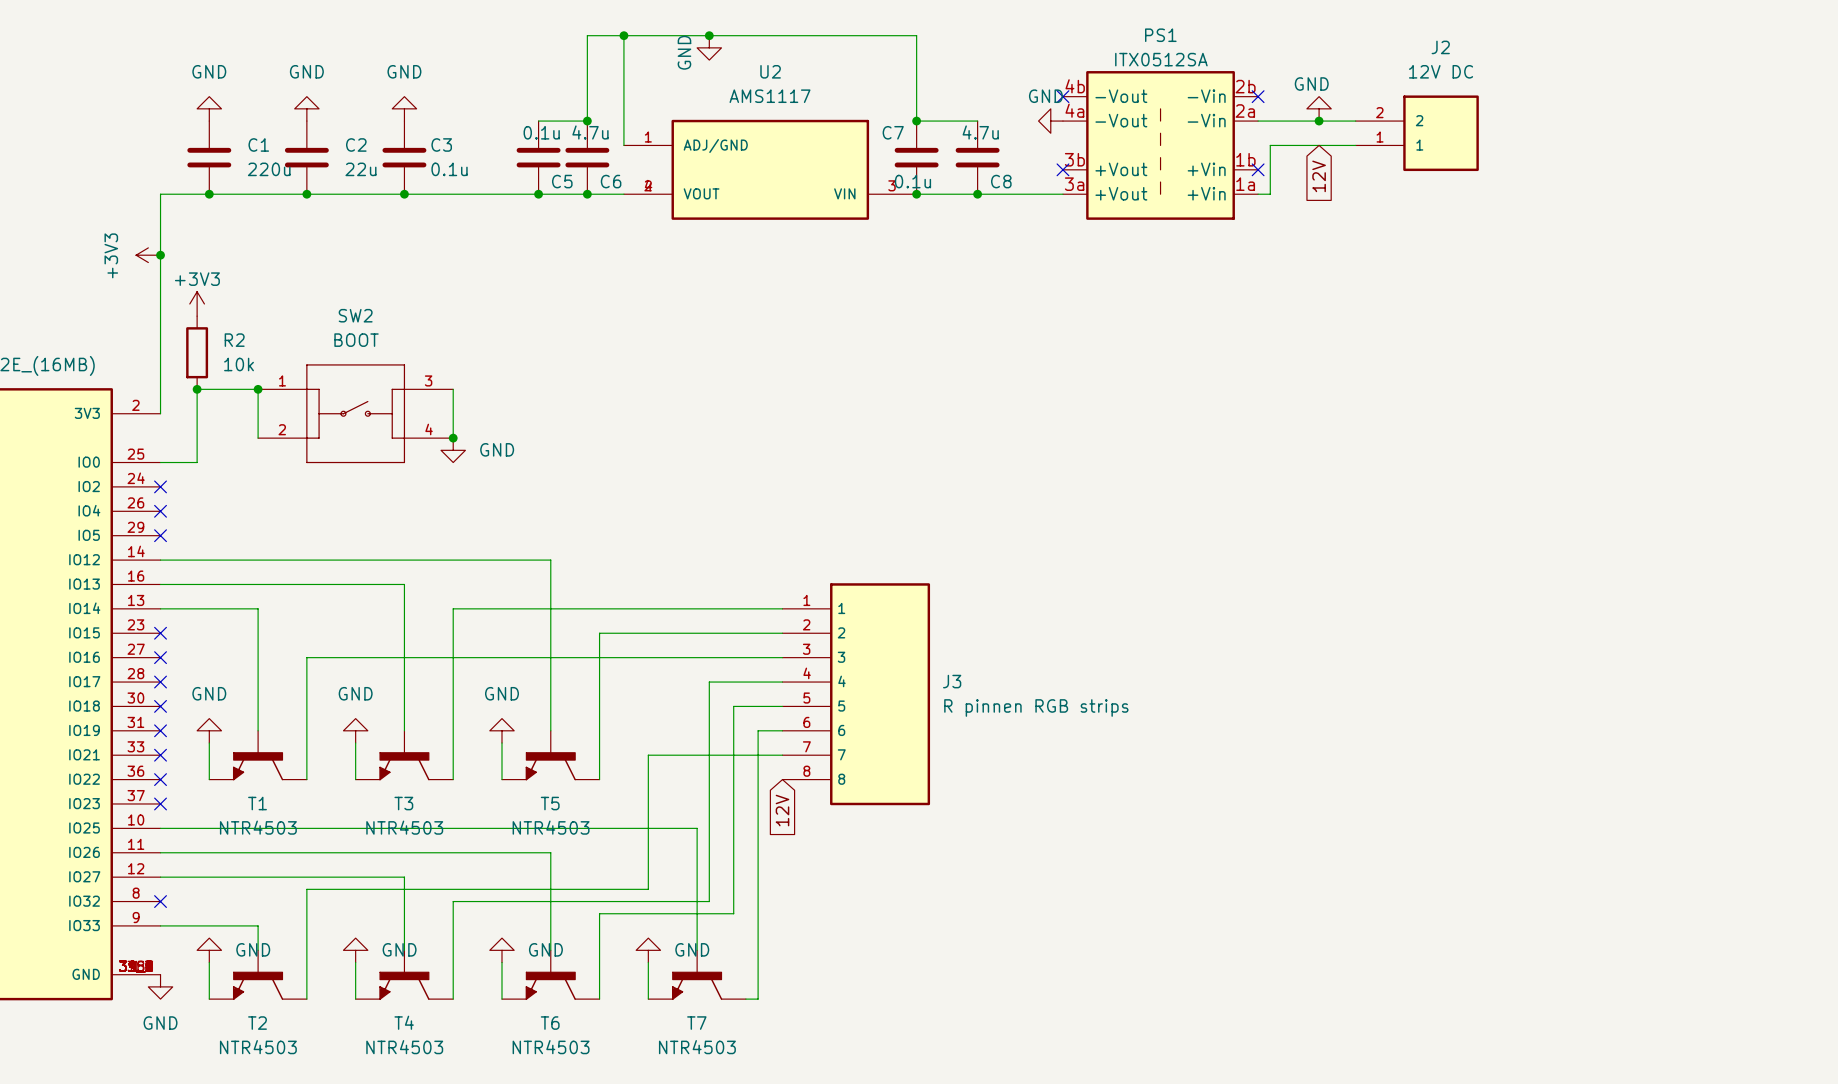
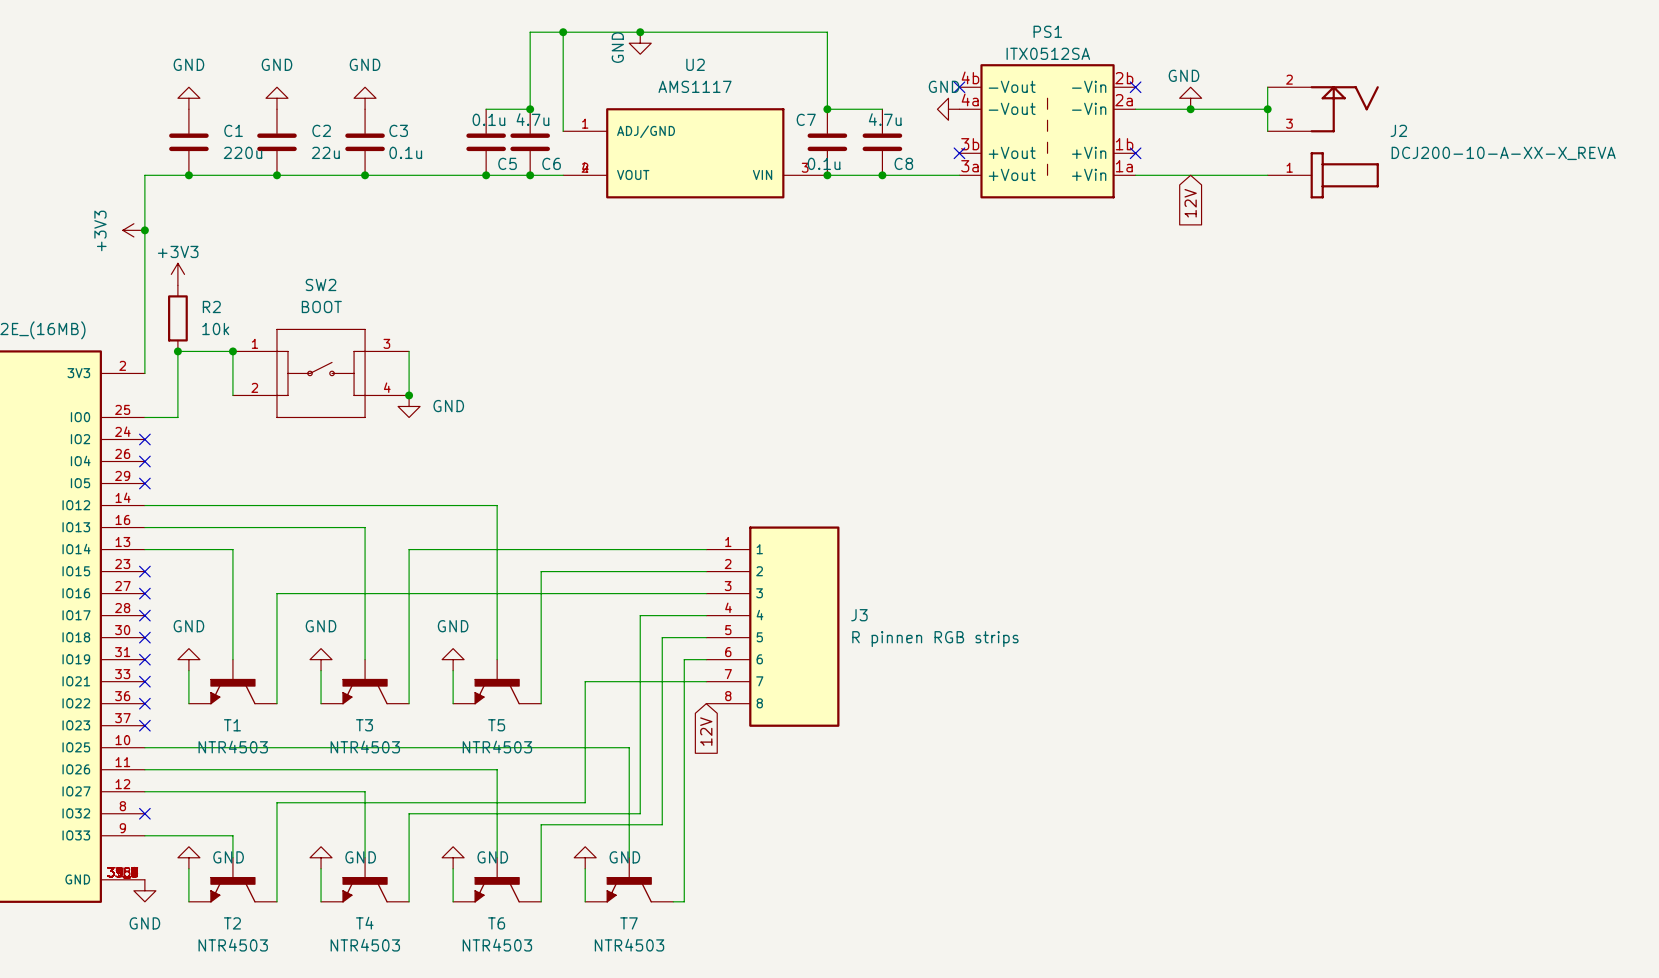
J2 name position: J2 (1440, 47) -> J2 (1398, 130)
J2 value: 12V DC (1441, 71) -> DCJ200-10-A-XX-X_REVA (1503, 153)
J2 symbol: [1355, 95, 1479, 172] -> [1267, 86, 1379, 199]
junction: none -> (1267, 109)
wire: (1355, 145) (1270, 145) (1270, 194) -> (1267, 175) (1146, 175)
global label position: 12V (1319, 176) -> 12V (1190, 203)

